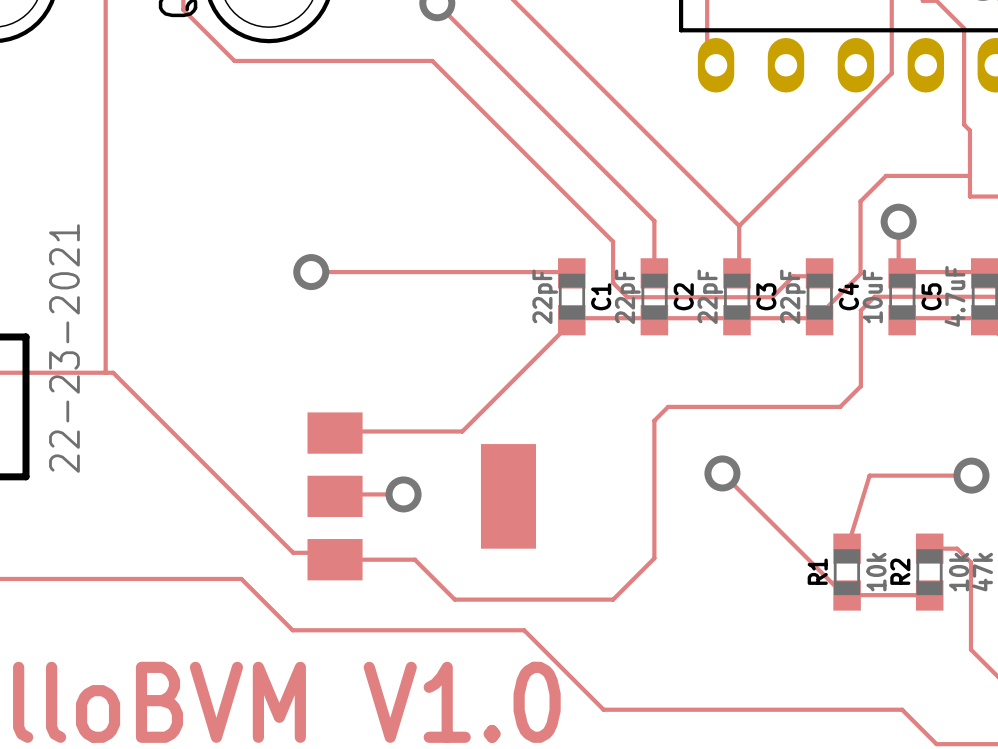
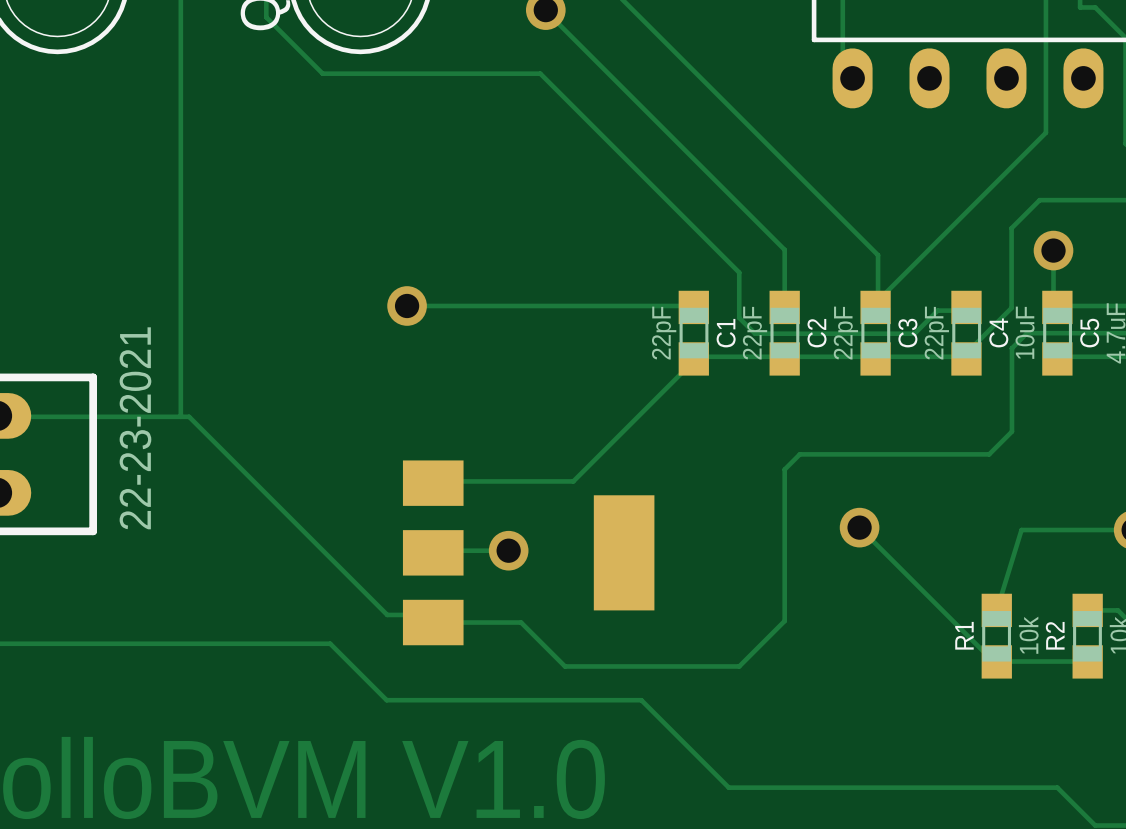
track: (891, 73) (739, 225) -> (1045, 87) (1045, 132) (878, 300)

